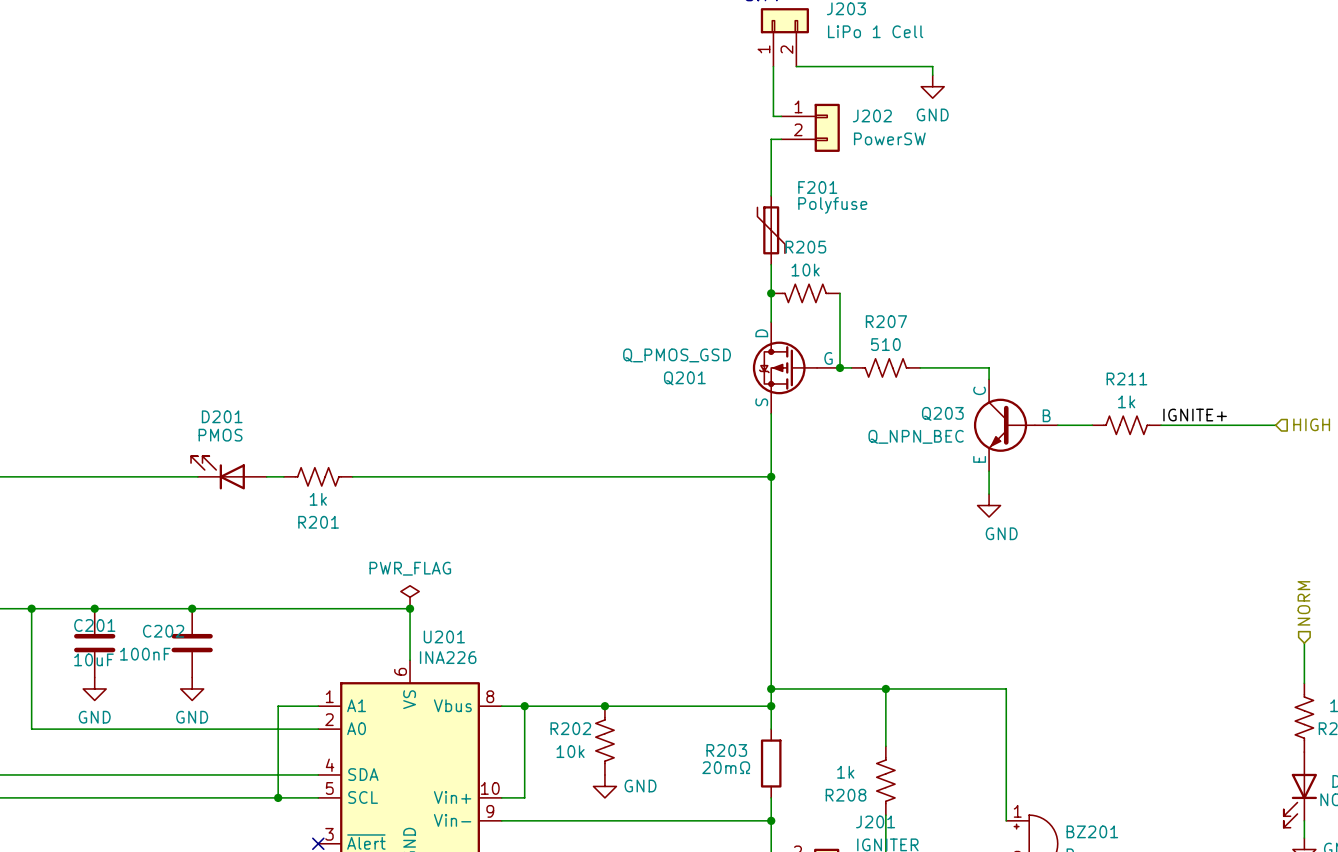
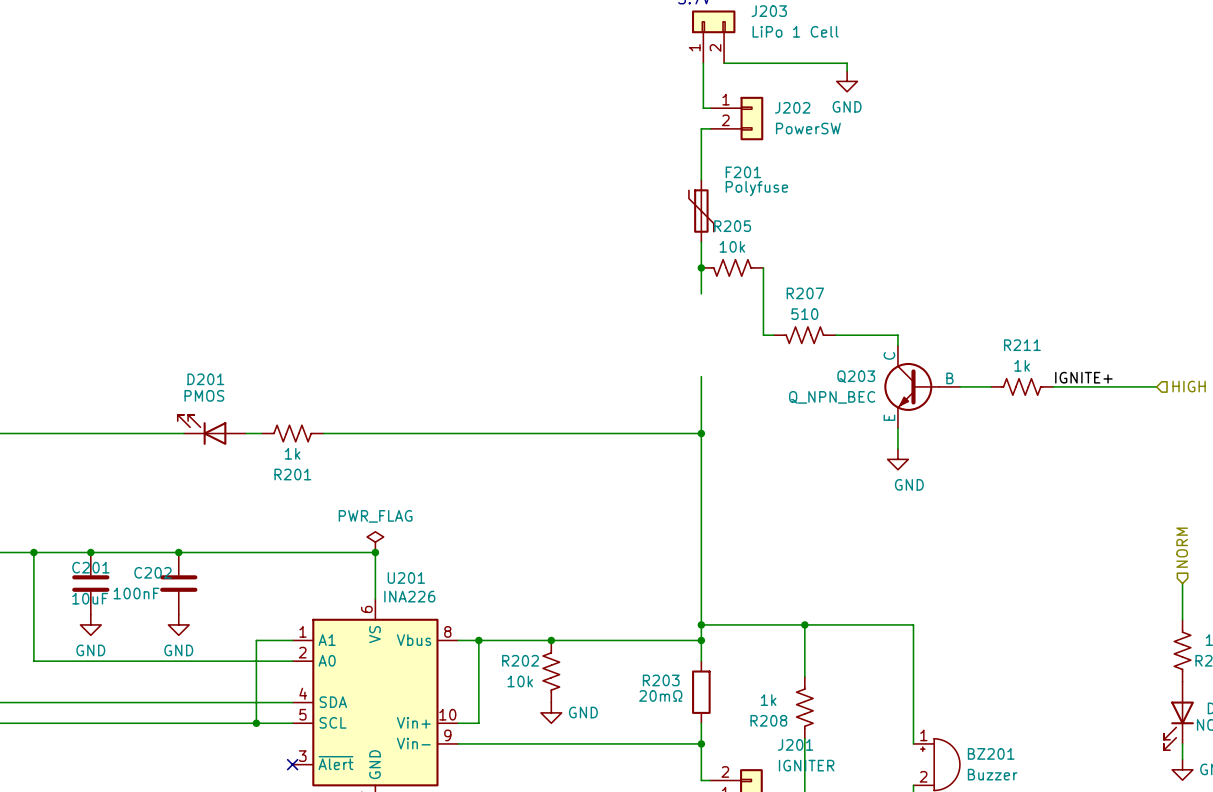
Q201: Q_PMOS_GSD (796, 367) -> none
junction: (840, 367) -> none

